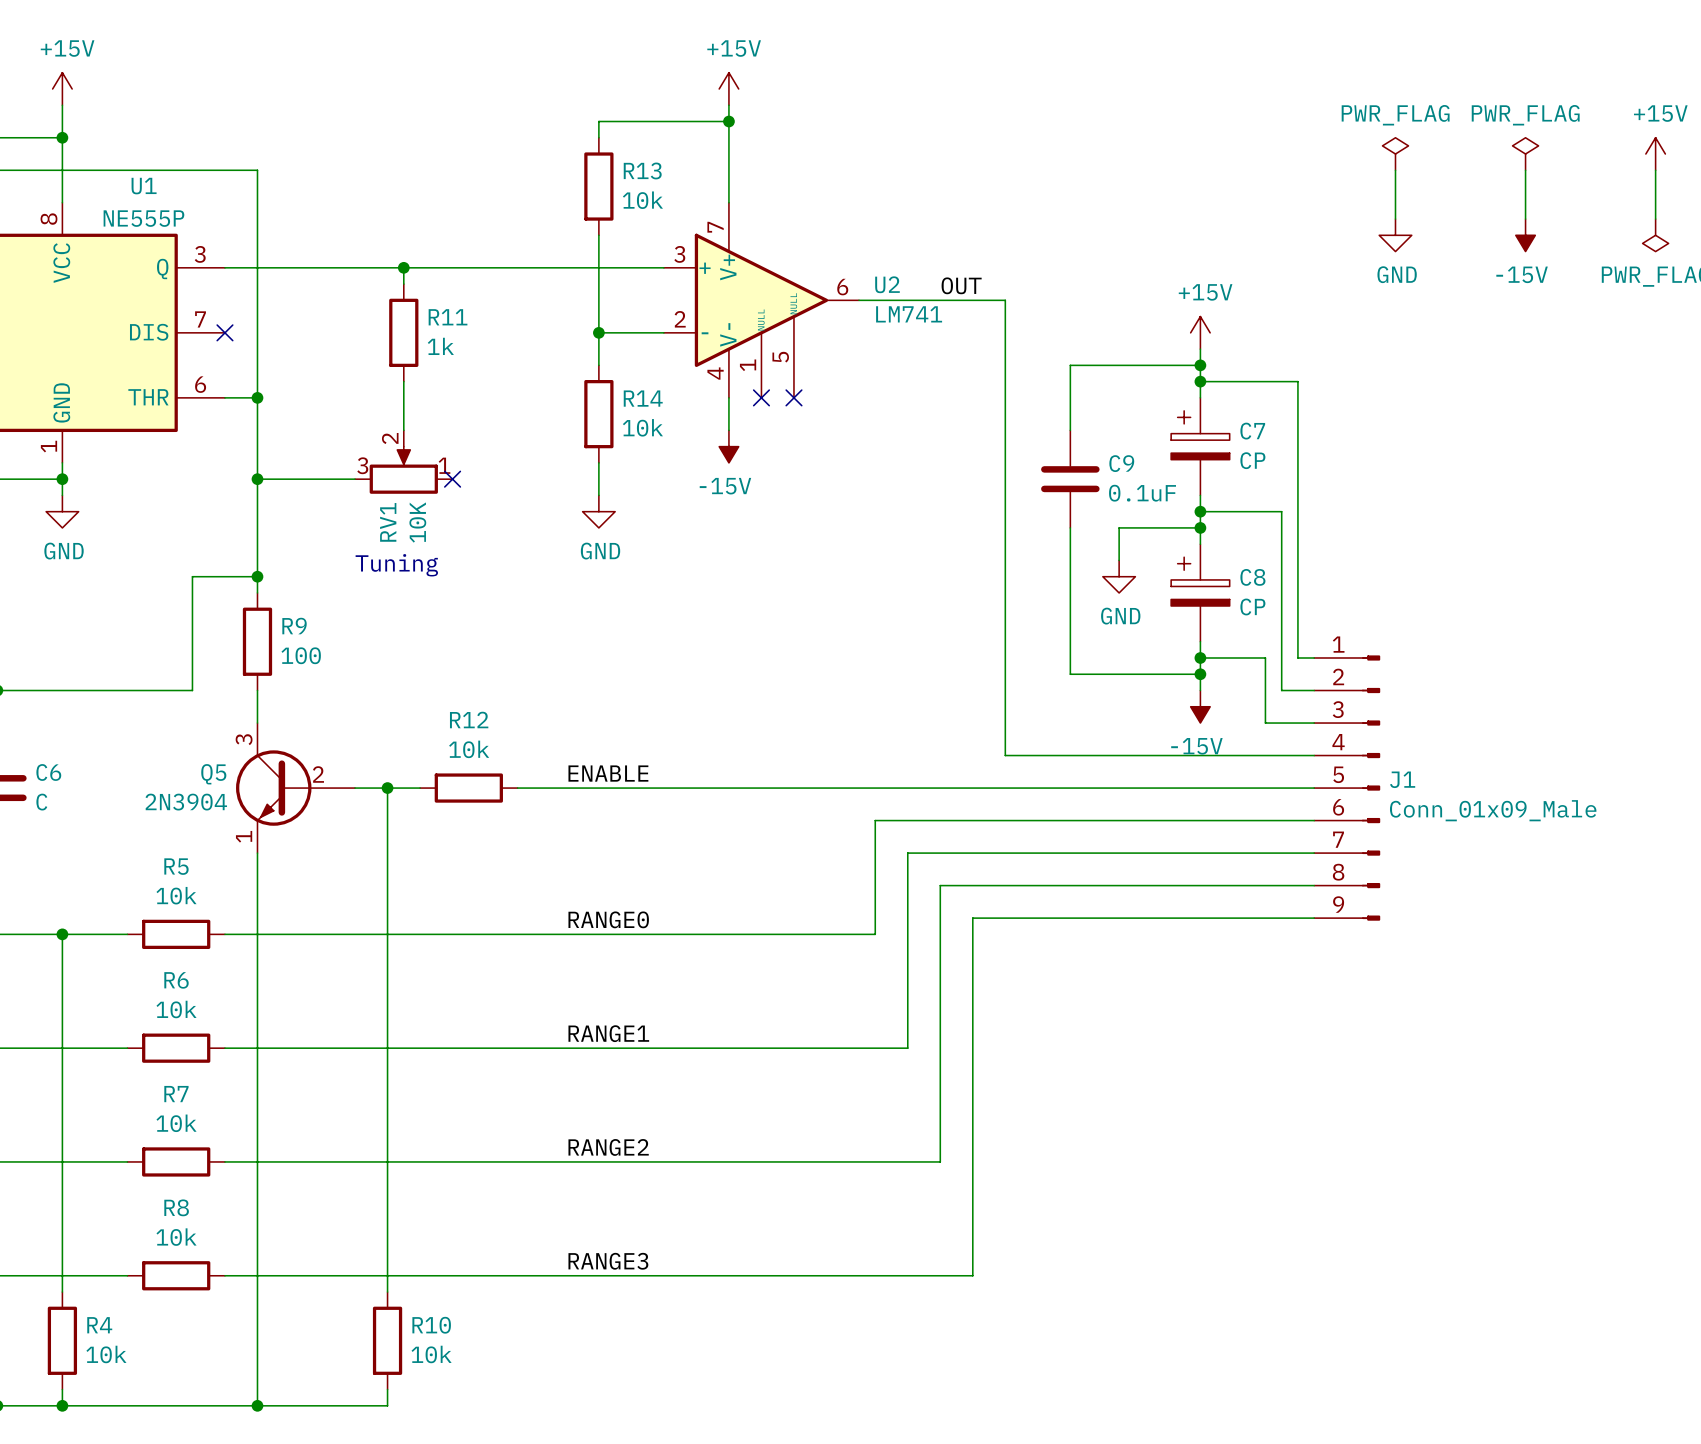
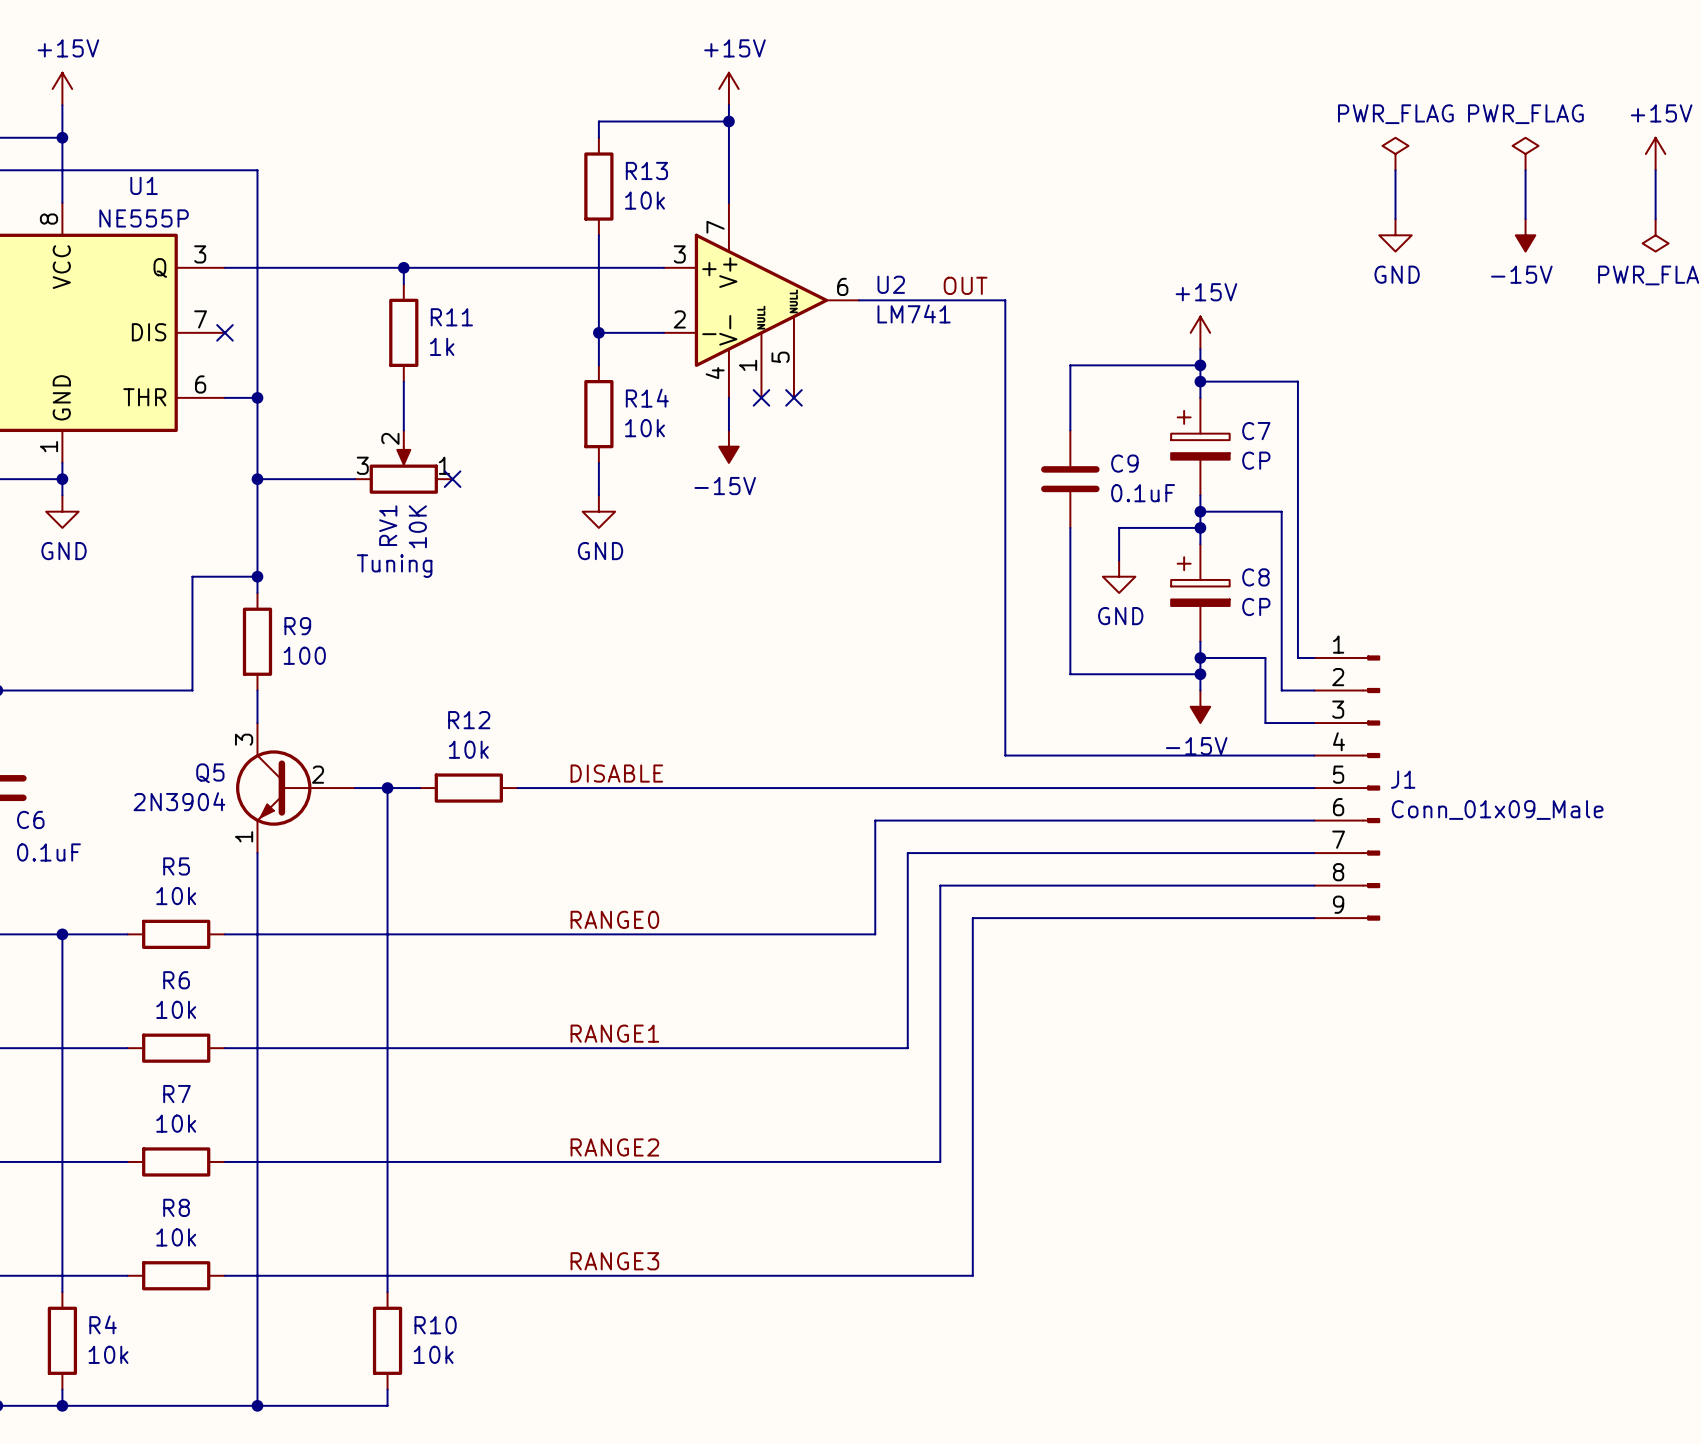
C6 name position: C6 (48, 772) -> C6 (30, 819)
label: ENABLE (608, 773) -> DISABLE (616, 773)
C6 value: C (41, 802) -> 0.1uF (48, 852)

